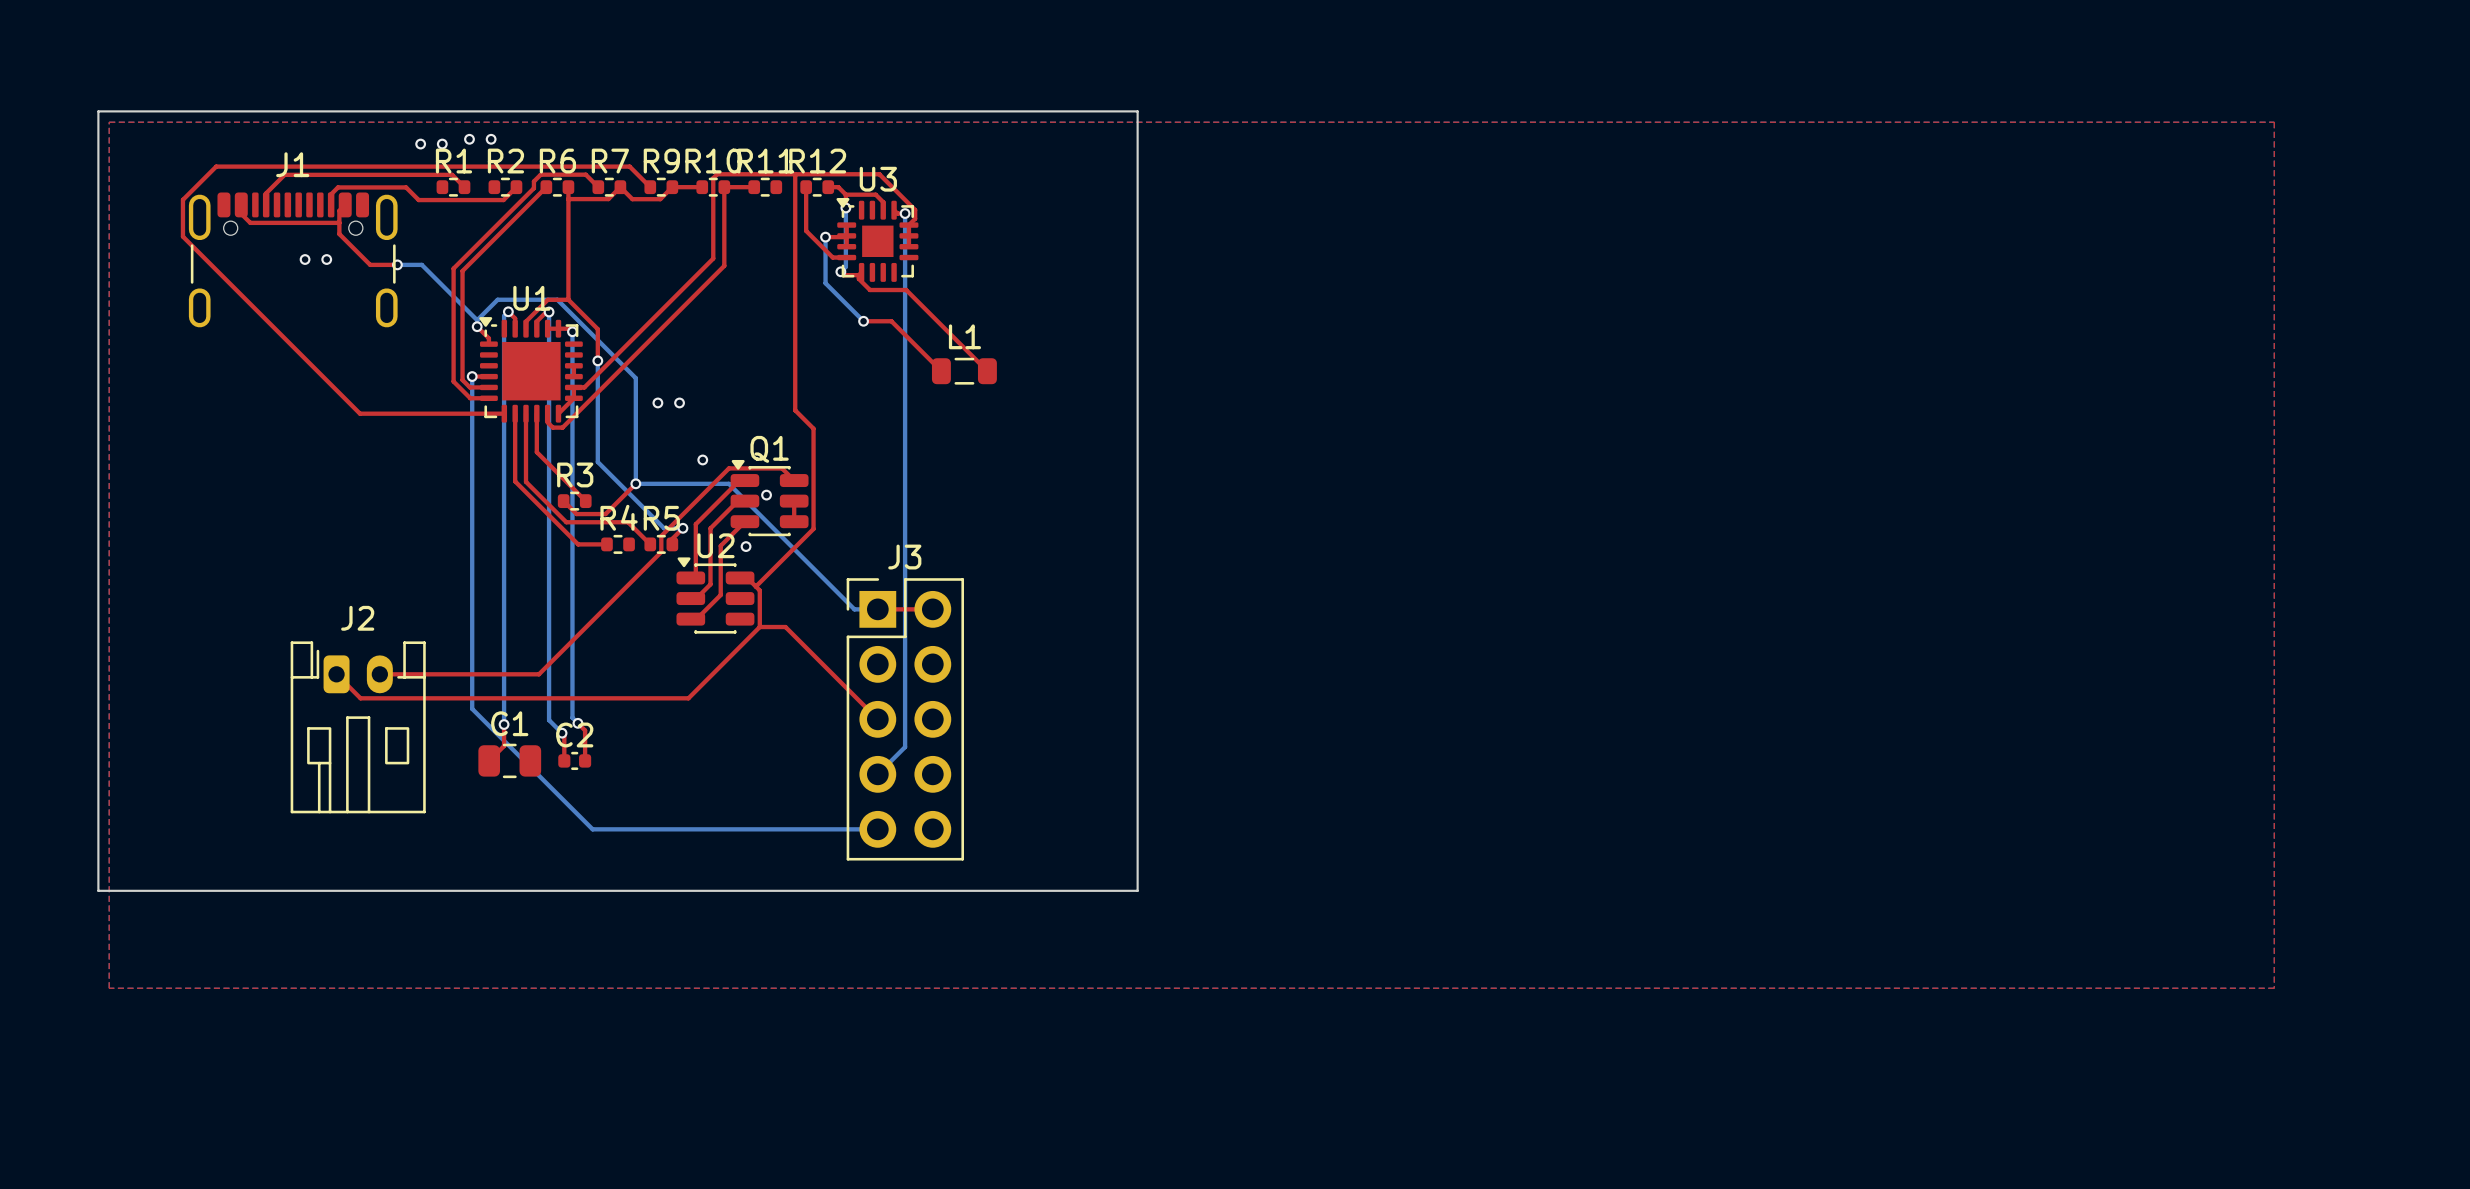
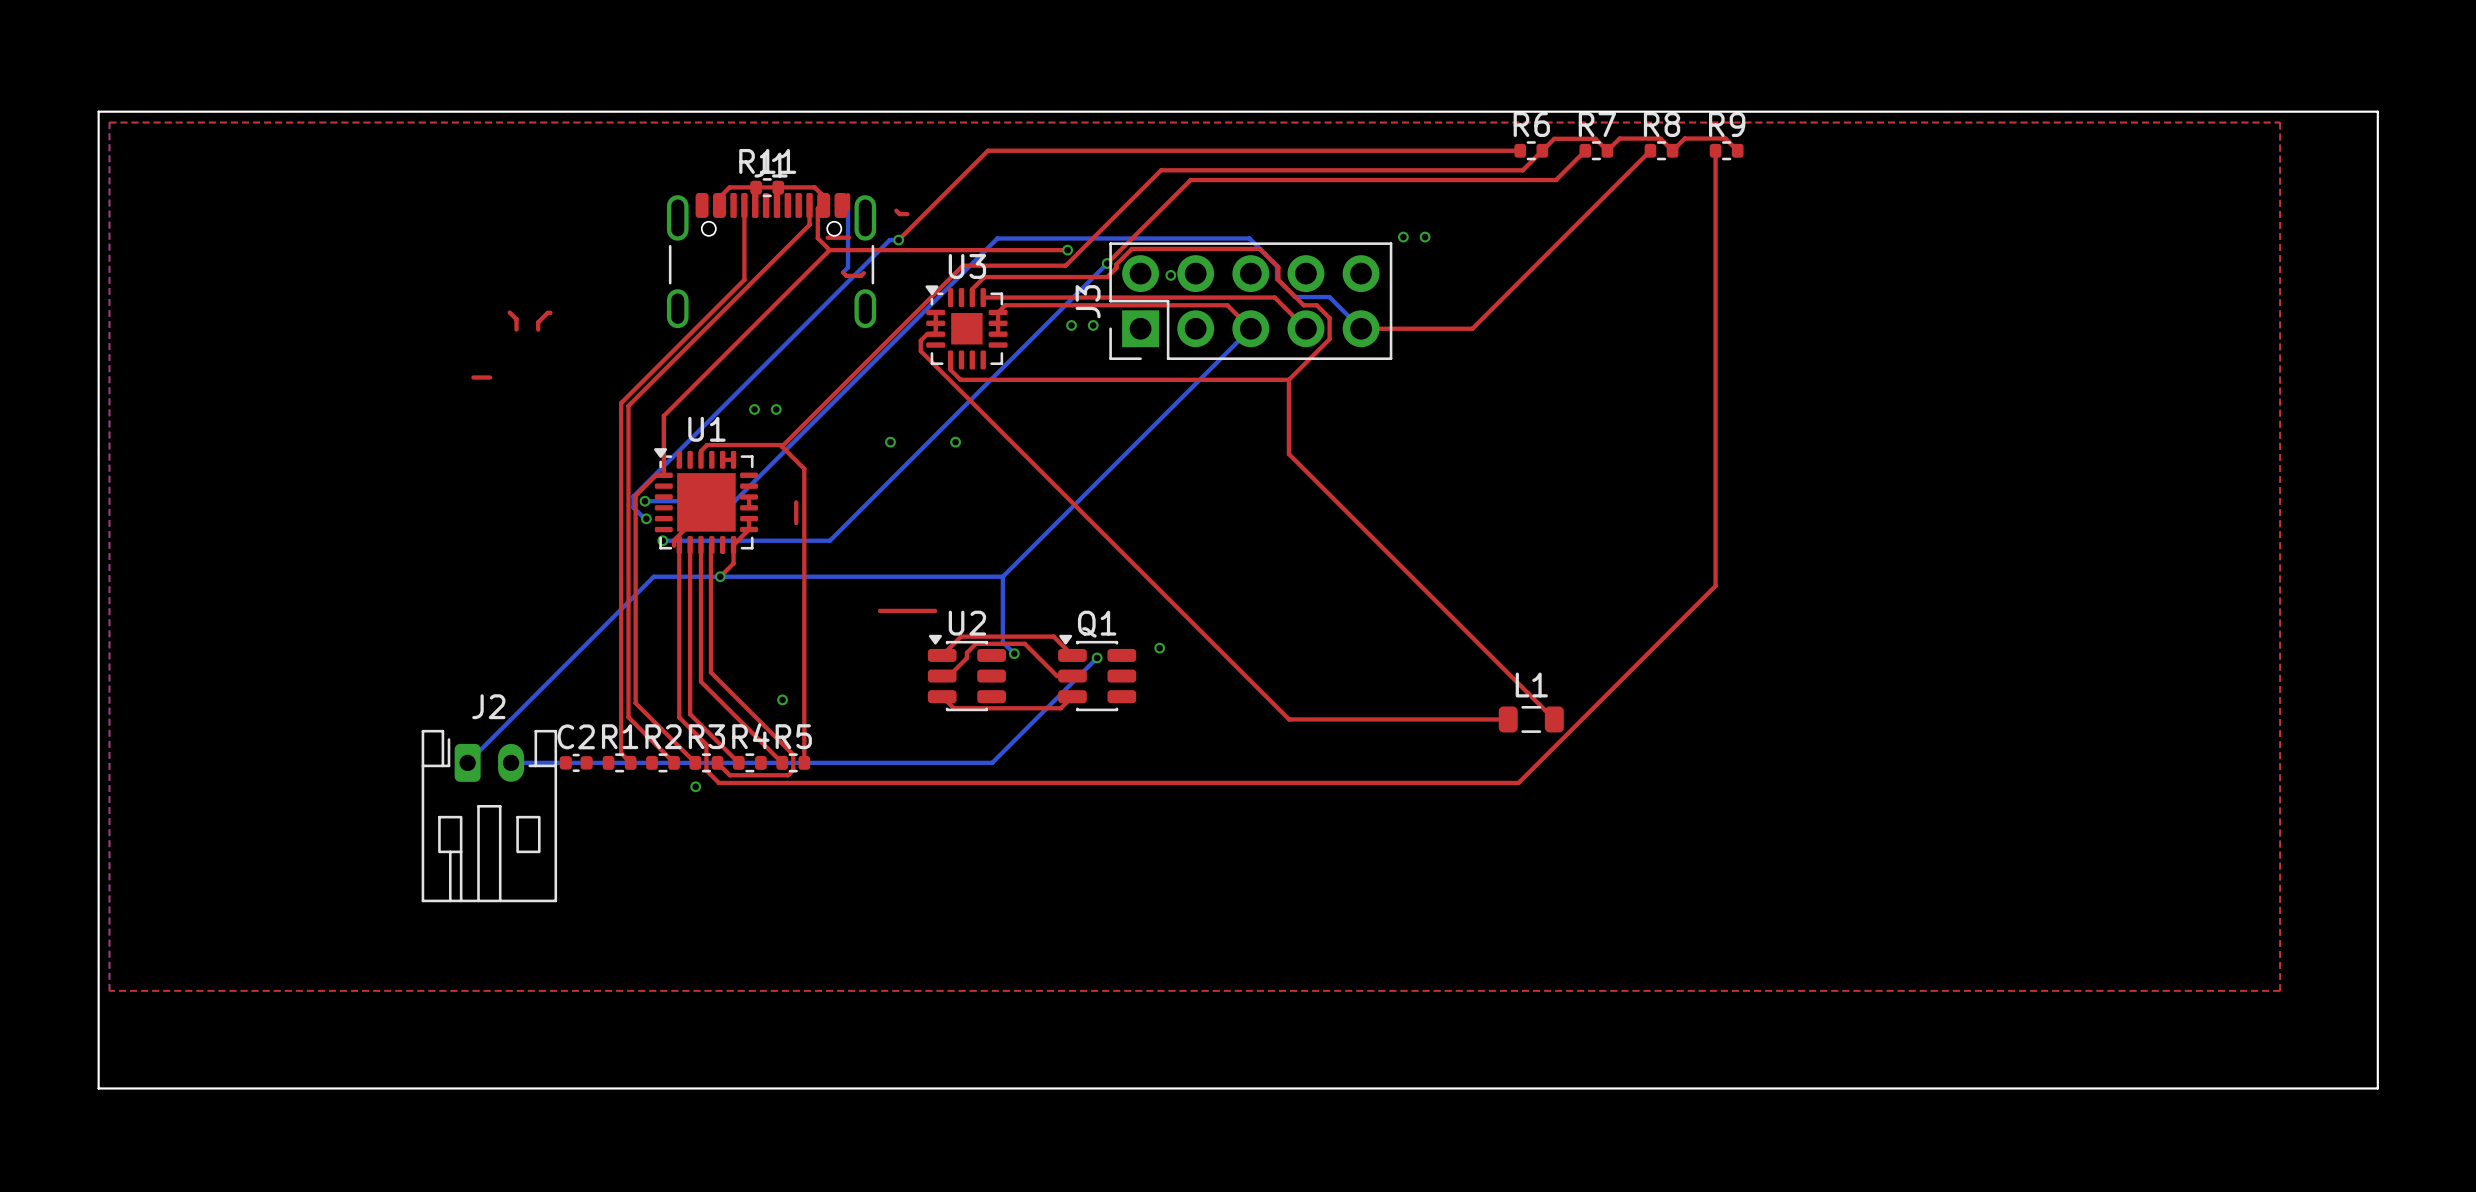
board edge: (1137, 111) (1137, 890) (98, 890) -> (1140, 111) (2377, 111) (2377, 1088) (98, 1088) (98, 893)
via: (469, 139) -> none
via: (491, 139) -> none
via: (420, 144) -> none
via: (442, 144) -> none
top track: none -> (1520, 150) (987, 150) (898, 240)
top track: none -> (1585, 150) (1556, 180) (1190, 180) (1107, 263)
top track: none -> (1650, 150) (1472, 328) (1361, 328)
R8: none -> (1661, 150)
top track: none -> (1715, 150) (1715, 585) (1518, 782) (718, 782) (706, 770) (706, 744) (679, 717) (679, 545)
top track: none -> (1737, 150) (1725, 138) (1684, 138) (1672, 150) (1660, 138) (1619, 138) (1607, 150) (1595, 138) (1554, 138) (1522, 170) (1161, 170) (1065, 265) (962, 265) (781, 446)
top track: (795, 174) (795, 410) (813, 428) (813, 528) (755, 586) -> none
R1 position: (453, 187) -> (619, 762)
top track: (464, 187) (452, 174) (284, 174) (266, 193) (266, 204) -> none
R2 position: (505, 187) -> (663, 762)
top track: (516, 187) (503, 200) (418, 200) (406, 187) (338, 187) (331, 194) (331, 204) -> none
top track: (546, 187) (462, 270) (462, 380) (469, 387) (488, 387) -> none
R6 position: (557, 187) -> (1531, 150)
top track: (568, 187) (568, 299) -> none
top track: (598, 187) (585, 174) (540, 174) (533, 181) (533, 188) (453, 268) (453, 381) (470, 398) (488, 398) -> none
R7 position: (609, 187) -> (1596, 150)
top track: (650, 187) (629, 166) (216, 166) (182, 199) (182, 236) (360, 413) (504, 413) -> none
R9 position: (661, 187) -> (1726, 150)
top track: (702, 187) (672, 187) (660, 199) (632, 199) (620, 187) (608, 199) (568, 199) -> none
R10: (713, 187) -> none
top track: (754, 187) (724, 187) (724, 265) (562, 427) (552, 427) (547, 422) (547, 413) -> none
top track: (806, 187) (806, 230) (832, 257) (846, 257) -> none
R12: (817, 187) -> none
top track: (828, 187) (838, 187) (845, 194) (875, 194) (883, 202) (883, 210) -> none
top track: (241, 204) (241, 213) (250, 222) (339, 222) -> none
top track: (345, 204) (339, 210) (339, 234) (370, 264) (397, 264) -> none
top track: none -> (719, 205) (719, 197) (729, 187) (814, 187) (820, 193) (820, 205)
top track: none -> (744, 205) (744, 279) (621, 403) (621, 753) (630, 762)
top track: none -> (809, 205) (809, 224) (628, 405) (628, 717) (674, 762)
top track: none -> (820, 205) (817, 208) (817, 238) (829, 250)
via: (845, 207) -> none
bottom track: (905, 213) (905, 747) (877, 774) -> none
via position: (905, 213) -> (898, 240)
top track: (846, 225) (846, 246) -> none
via: none -> (1403, 237)
via: none -> (1425, 237)
bottom track: (825, 237) (825, 283) (863, 321) -> none
via: (825, 237) -> none
U3 position: (877, 239) -> (966, 327)
bottom track: none -> (898, 240) (889, 240) (633, 496) (633, 507) (646, 518)
top track: (908, 246) (908, 225) (915, 218) (915, 210) (879, 174) (717, 174) (713, 178) (713, 258) (584, 387) (573, 387) (573, 398) (558, 413) -> none
top track: none -> (829, 250) (1067, 250)
top track: none -> (829, 250) (663, 415) (663, 475) (656, 475) (635, 495) (635, 703) (695, 762)
via: none -> (1067, 250)
J1 position: (293, 259) -> (771, 260)
via: (305, 259) -> none
via: (326, 259) -> none
bottom track: none -> (1107, 263) (829, 540) (662, 540)
via: none -> (1107, 263)
bottom track: (397, 264) (421, 264) (477, 320) -> none
via: (397, 264) -> none
via: (840, 271) -> none
via: none -> (1170, 275)
top track: (858, 275) (858, 278) (869, 290) (906, 290) (987, 371) -> none
top track: none -> (972, 297) (972, 289) (984, 277) (1107, 277) (1131, 248) (1259, 248) (1278, 267) (1278, 279) (1303, 305) (1316, 305) (1329, 318) (1329, 339) (1288, 379)
top track: none -> (983, 297) (1274, 297) (1305, 328)
top track: (568, 299) (547, 299) (526, 321) (526, 328) -> none
top track: (568, 299) (597, 329) (597, 360) -> none
bottom track: (508, 311) (504, 316) (504, 724) -> none
via: (508, 311) -> none
top track: none -> (935, 312) (935, 334) (927, 334) (920, 340) (920, 351) (1289, 719) (1508, 719)
bottom track: (549, 312) (549, 720) (562, 733) -> none
via: (549, 312) -> none
bottom track: (477, 320) (497, 299) (557, 299) (635, 378) (635, 483) (728, 483) (854, 609) (877, 609) -> none
top track: (863, 321) (891, 321) (941, 371) -> none
via: (863, 321) -> none
via: none -> (1071, 325)
via: none -> (1093, 325)
top track: (477, 326) (488, 338) (488, 344) -> none
via: (477, 326) -> none
top track: none -> (1250, 328) (1227, 305) (1005, 305) (998, 312) (998, 334)
bottom track: none -> (1250, 328) (1002, 576)
bottom track: none -> (1361, 328) (1329, 297) (1295, 297) (1277, 278) (1277, 265) (1249, 238) (997, 238) (734, 501) (644, 501)
top track: (547, 328) (569, 328) (572, 331) -> none
bottom track: (572, 331) (572, 717) (577, 723) -> none
via: (572, 331) -> none
top track: none -> (950, 359) (950, 369) (960, 379) (1288, 379)
bottom track: (597, 360) (597, 462) (664, 528) (682, 528) -> none
via: (597, 360) -> none
top track: (573, 365) (573, 376) -> (749, 496) (749, 507)
U1 position: (531, 369) -> (706, 501)
L1 position: (964, 371) -> (1531, 719)
bottom track: (472, 376) (472, 708) (592, 829) (877, 829) -> none
via: (472, 376) -> none
top track: none -> (1288, 379) (1288, 454) (1554, 719)
via: (657, 402) -> none
via: (679, 402) -> none
via: none -> (754, 409)
via: none -> (776, 409)
top track: (515, 413) (515, 481) (578, 544) (606, 544) -> none
top track: (526, 413) (526, 481) (566, 522) (628, 522) (650, 544) -> none
top track: (536, 413) (536, 452) (585, 501) -> none
via: none -> (890, 442)
via: none -> (955, 442)
top track: none -> (701, 459) (701, 451) (707, 445) (780, 445) (804, 468) (804, 762)
top track: none -> (722, 459) (733, 459)
via: (702, 459) -> none
top track: (744, 480) (739, 480) (695, 524) (695, 572) (690, 577) -> none
top track: (794, 480) (782, 468) (728, 468) (661, 536) (661, 551) (538, 674) (379, 674) -> none
top track: (635, 483) (605, 514) (576, 514) (563, 501) -> none
via: (635, 483) -> none
via: (766, 495) -> none
Q1 position: (769, 498) -> (1097, 673)
via: none -> (644, 501)
R3 position: (574, 501) -> (706, 762)
top track: (744, 501) (737, 501) (710, 528) (710, 584) (696, 598) (690, 598) -> none
via: none -> (646, 518)
top track: none -> (749, 518) (749, 529) (733, 545) (733, 563) (720, 576)
top track: (744, 521) (720, 545) (720, 595) (696, 619) (690, 619) -> none
via: (682, 528) -> none
via: none -> (662, 540)
top track: none -> (690, 545) (690, 714) (738, 762)
top track: none -> (701, 545) (701, 681) (782, 762)
top track: none -> (711, 545) (710, 672) (793, 754) (793, 770) (788, 775) (729, 775) (717, 762)
R4 position: (618, 544) -> (749, 762)
R5 position: (661, 544) -> (793, 762)
via: (746, 546) -> none
via: none -> (720, 576)
bottom track: none -> (1002, 576) (653, 576) (467, 762)
bottom track: none -> (1002, 576) (1002, 642) (1014, 653)
top track: (740, 577) (747, 577) (759, 590) (759, 627) -> none
U2 position: (715, 595) -> (966, 673)
top track: (759, 627) (688, 698) (360, 698) (336, 674) -> none
top track: (759, 627) (785, 627) (877, 719) -> none
via: none -> (1159, 648)
via: none -> (1014, 653)
top track: none -> (942, 655) (961, 636) (1053, 636) (1072, 655)
bottom track: none -> (1097, 657) (992, 762) (511, 762)
via: none -> (1097, 657)
top track: none -> (942, 676) (949, 676) (966, 658) (966, 652) (975, 643) (1024, 643) (1057, 676) (1072, 676)
top track: none -> (942, 696) (953, 708) (1060, 708) (1072, 696)
via: none -> (782, 699)
J3 rotation: 0° (905, 719) -> 90° counterclockwise (1250, 301)
J3 position: (905, 719) -> (1250, 301)
top track: (577, 723) (585, 730) (585, 760) -> none
via: (577, 723) -> none
top track: (504, 724) (504, 746) (489, 760) -> none
via: (504, 724) -> none
J2 position: (358, 727) -> (489, 816)
top track: (562, 733) (564, 735) (564, 760) -> none
via: (562, 733) -> none
C1: (509, 760) -> none
via: none -> (695, 786)

